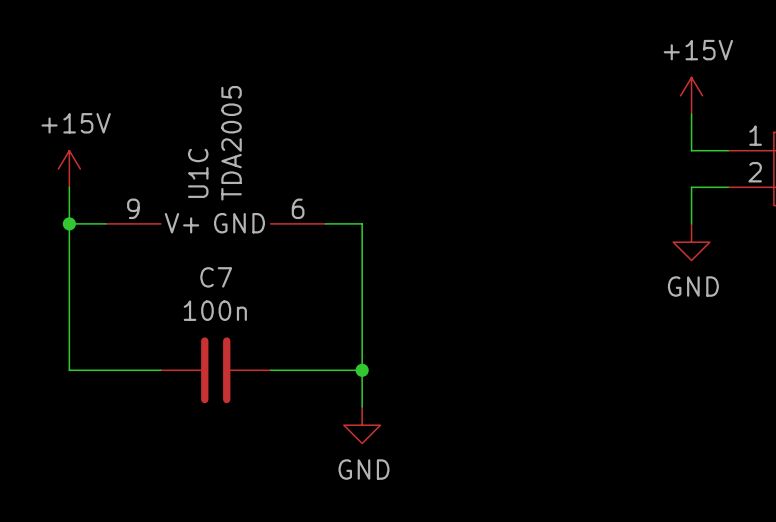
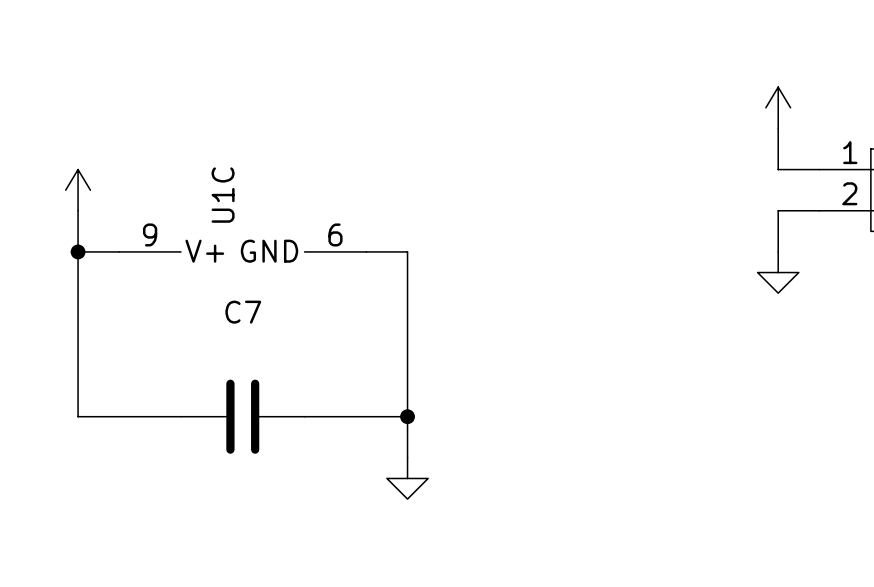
power symbol text: +15V (698, 50) -> none
power symbol text: +15V (76, 123) -> none
U1C value: TDA2005 (231, 143) -> none
power symbol text: GND (693, 286) -> none
C7 value: 100n (215, 310) -> none
power symbol text: GND (363, 469) -> none

